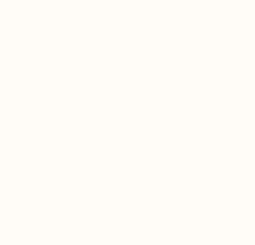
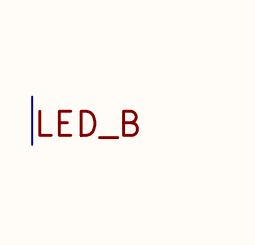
wire: none -> (32, 96) (32, 144)
label: none -> LED_B (88, 124)

